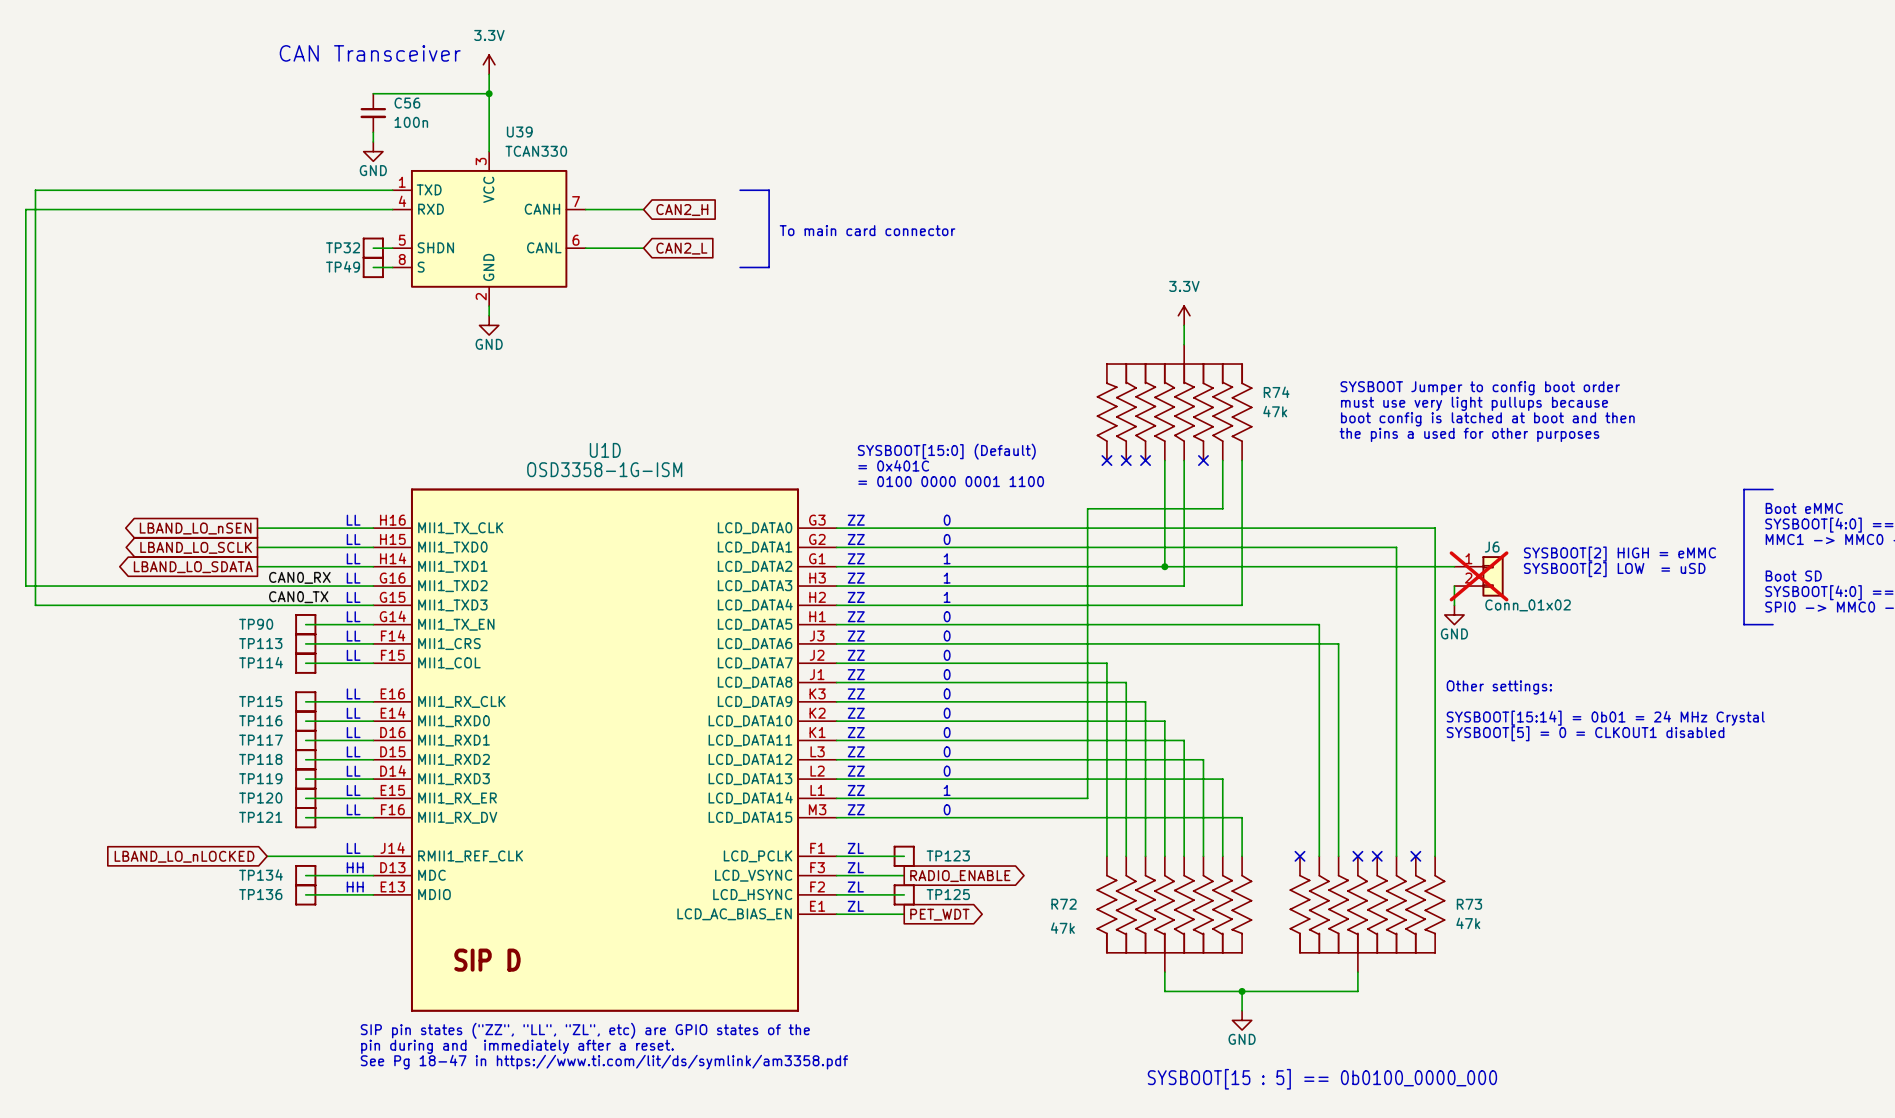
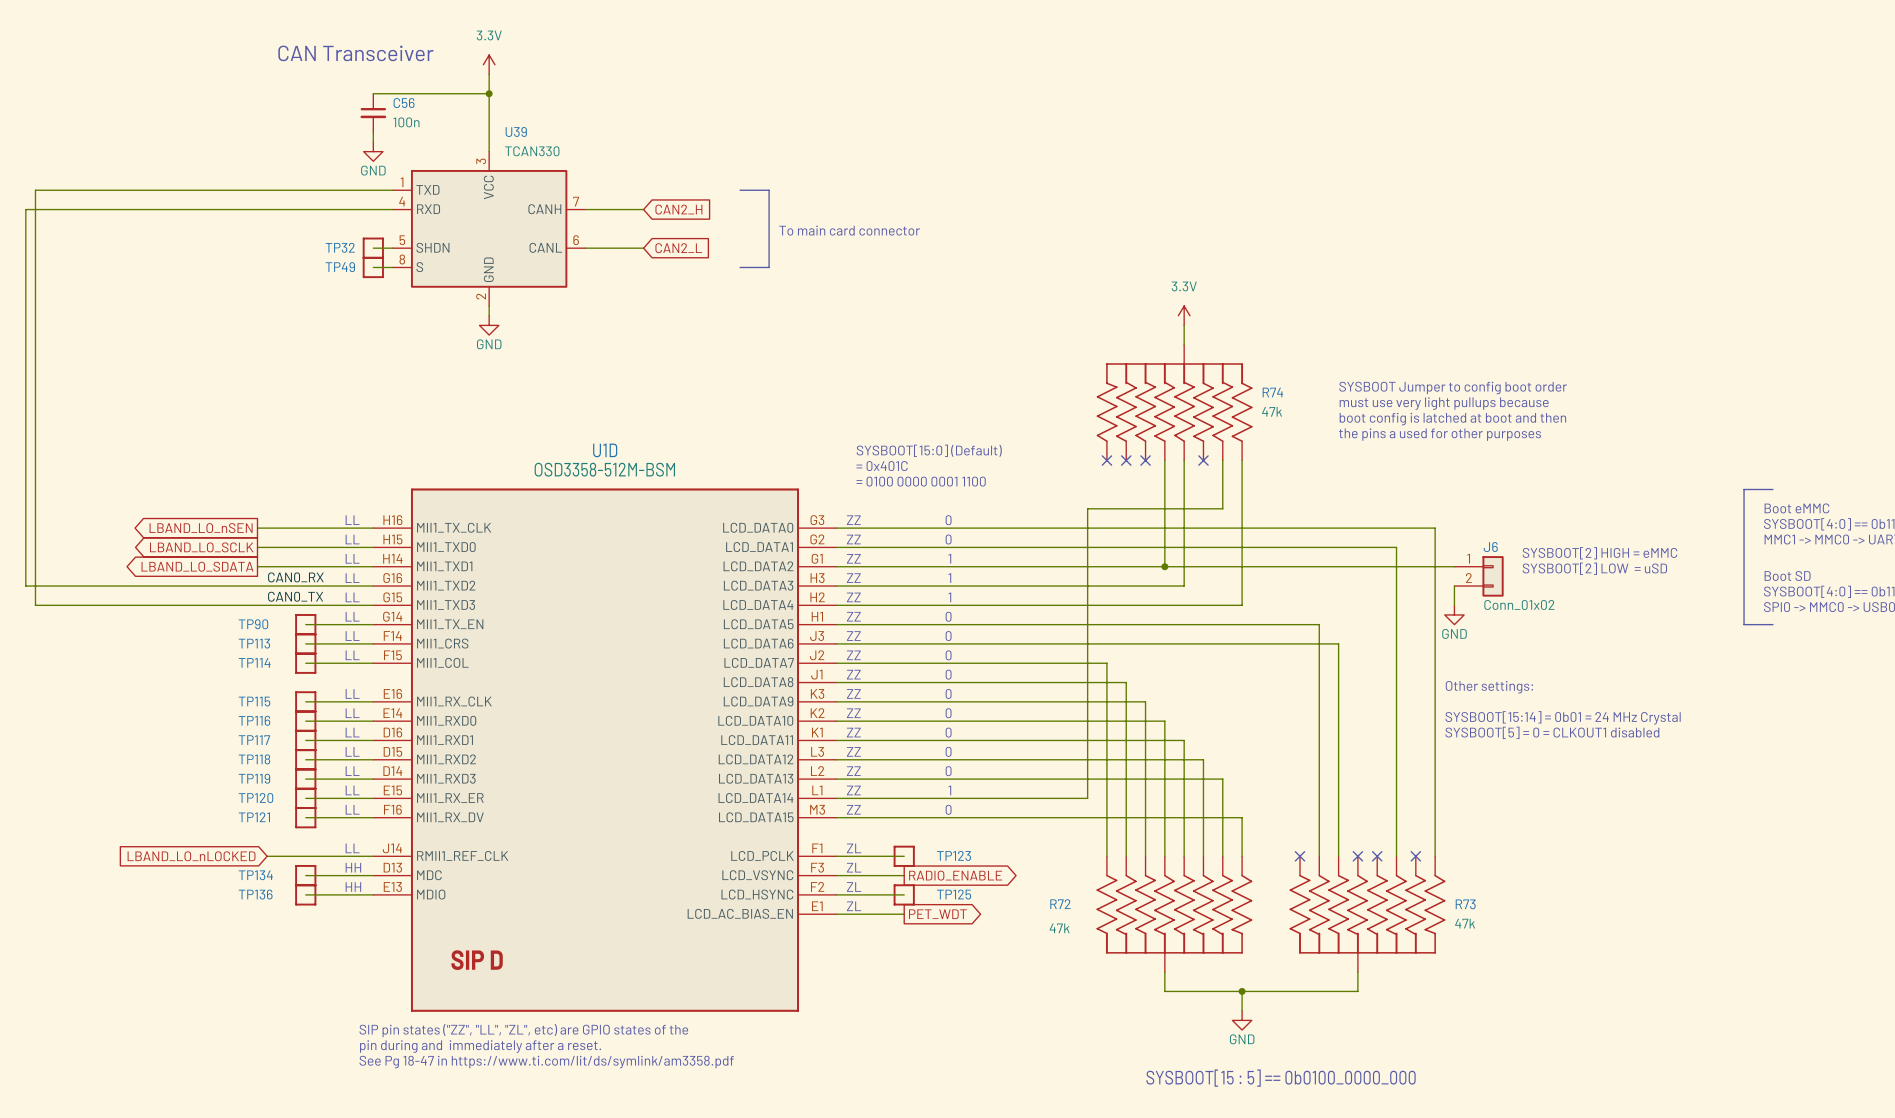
U1D value: OSD3358-1G-ISM (604, 469) -> OSD3358-512M-BSM (604, 469)
J6 do-not-place cross: (1479, 576) -> none

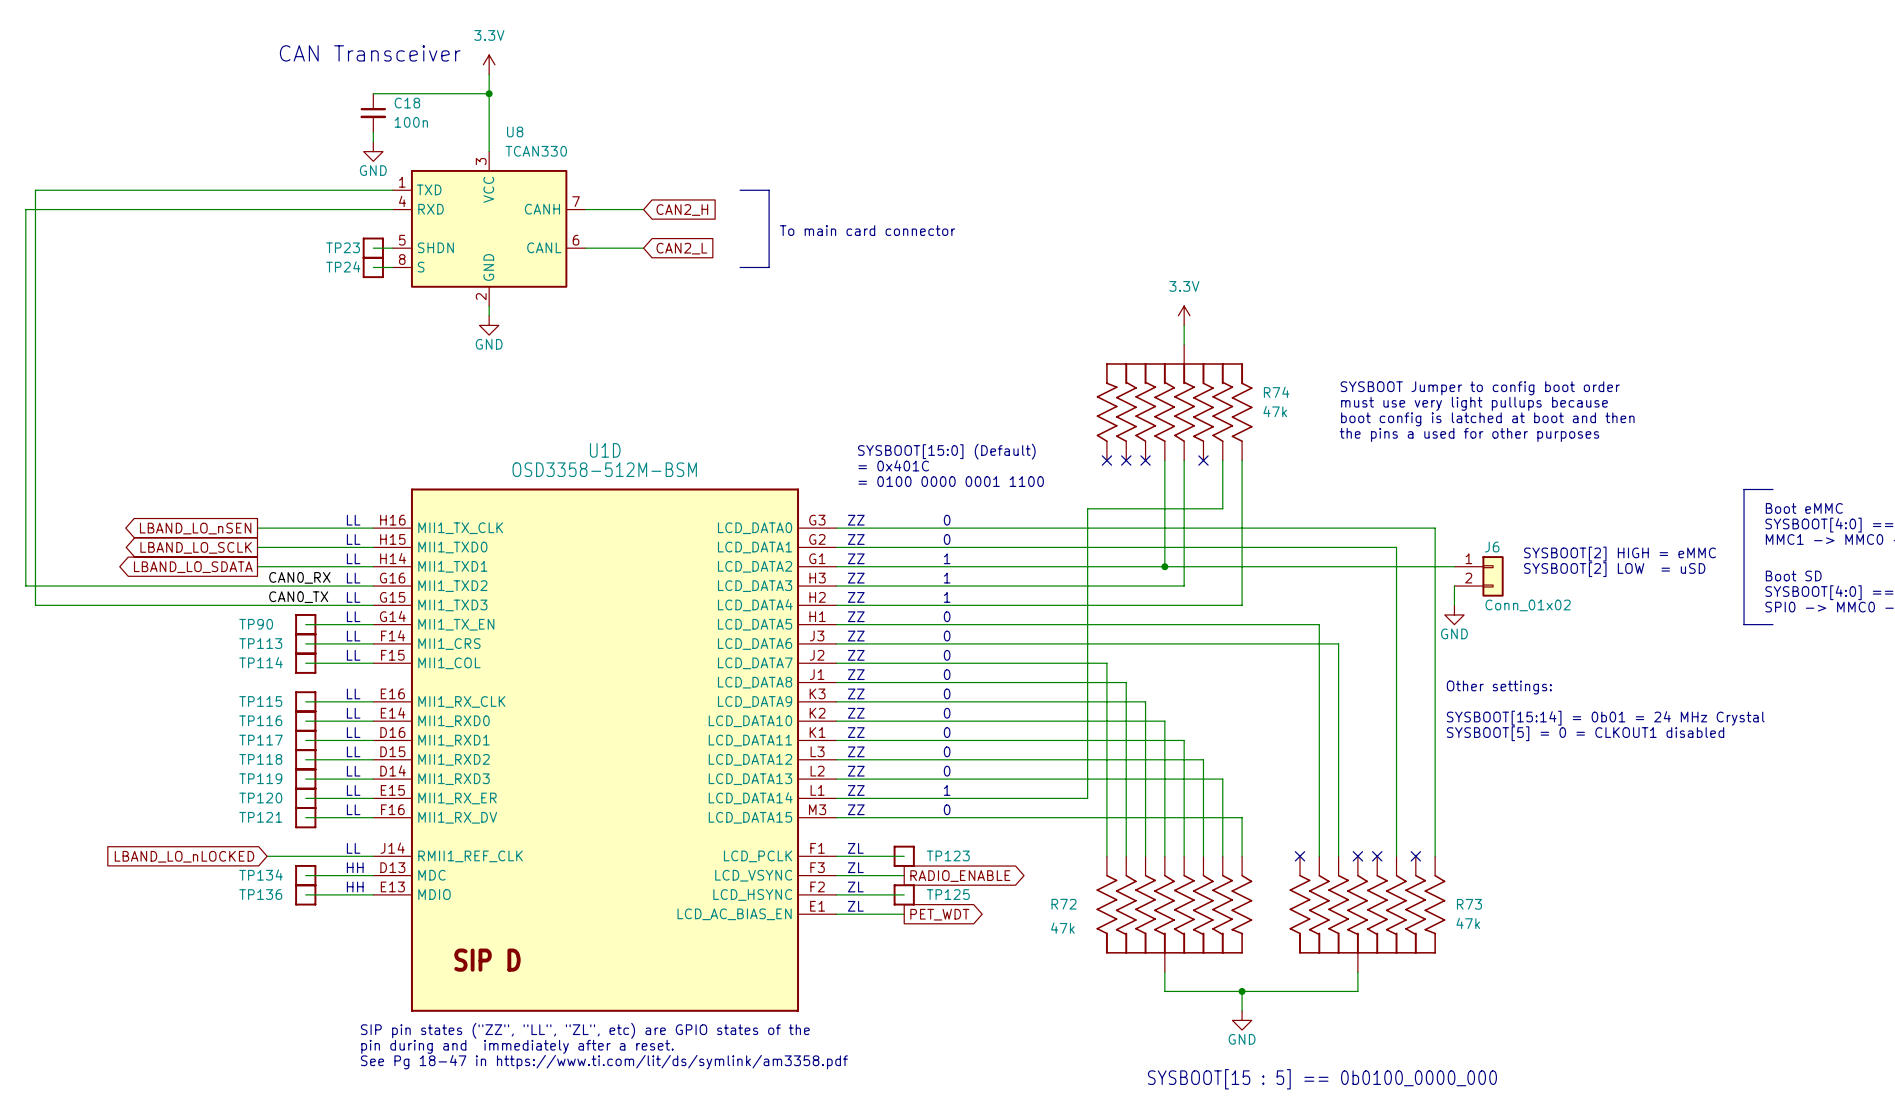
C56 name: C56 (404, 103) -> C18 (407, 103)
U39 name: U39 (516, 131) -> U8 (515, 131)
TP32 name: TP32 (340, 247) -> TP23 (343, 247)
TP49 name: TP49 (340, 267) -> TP24 (343, 266)

